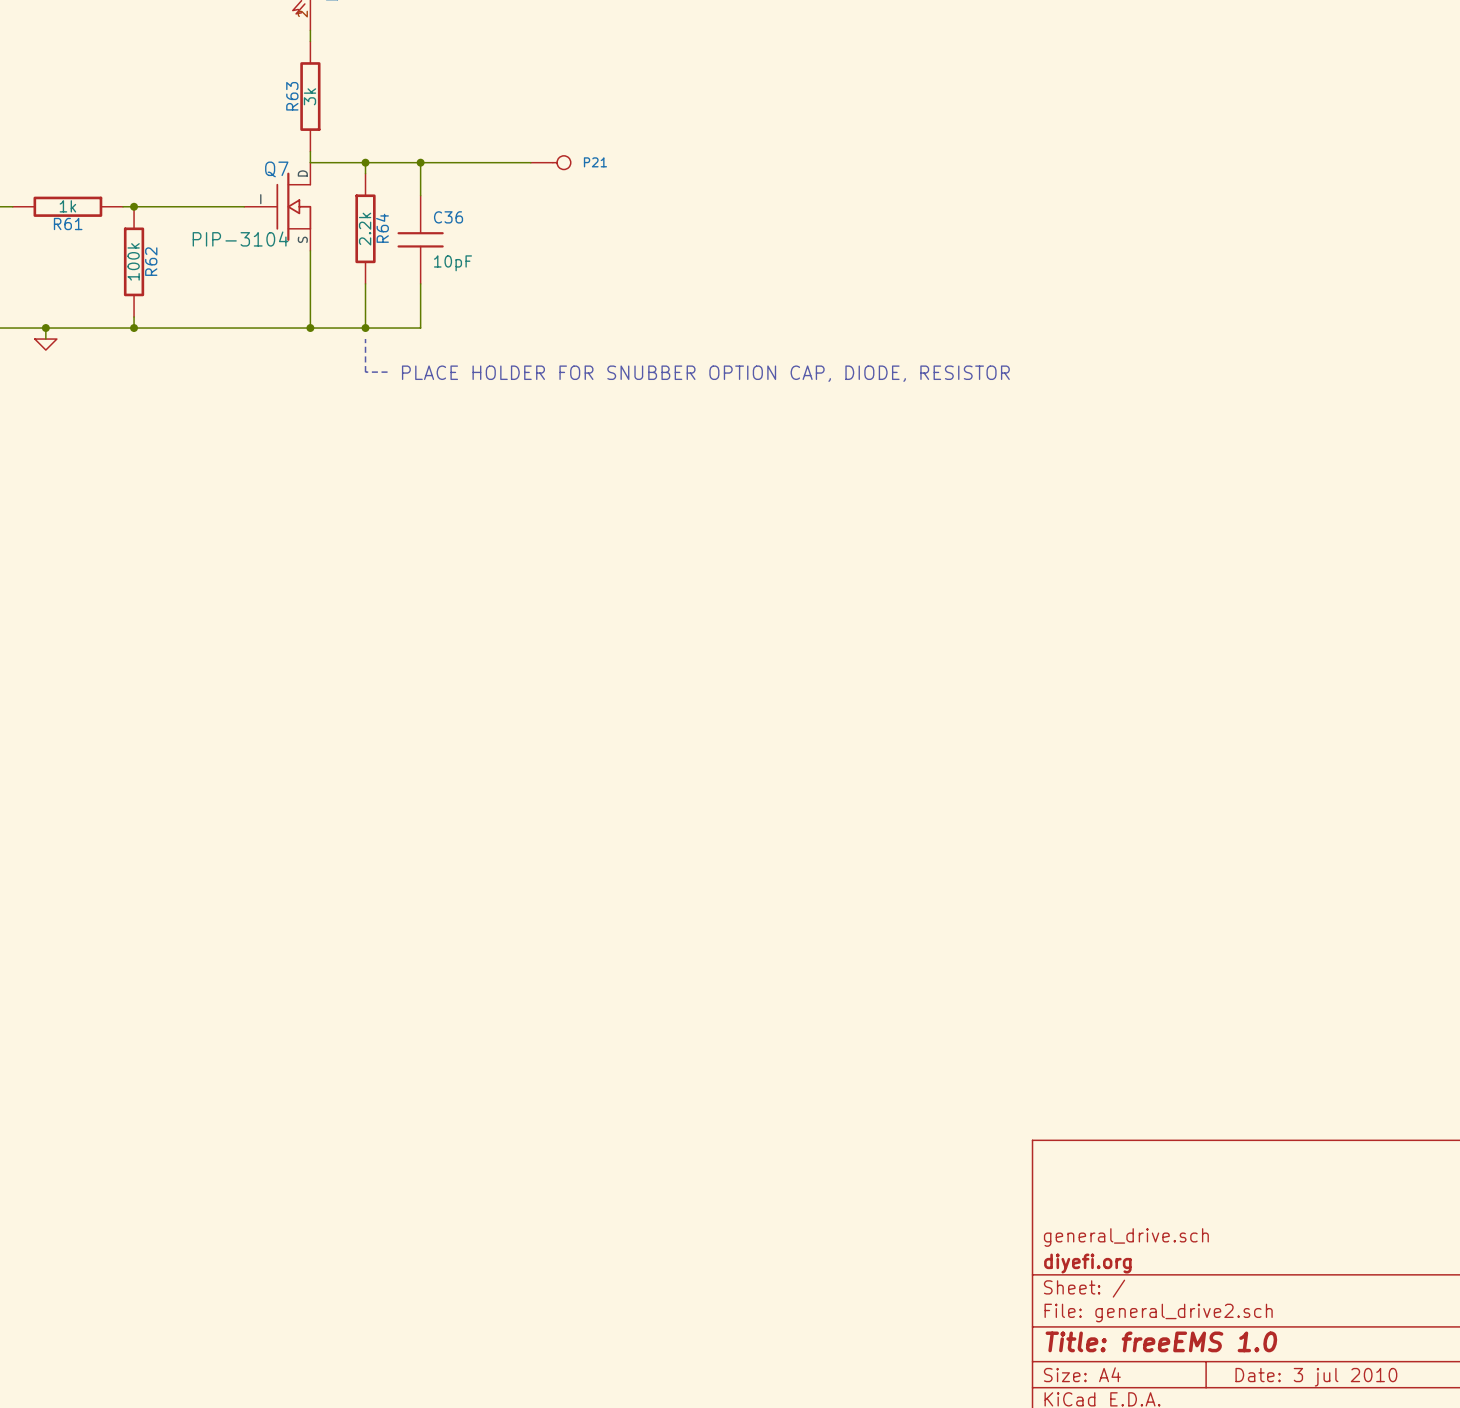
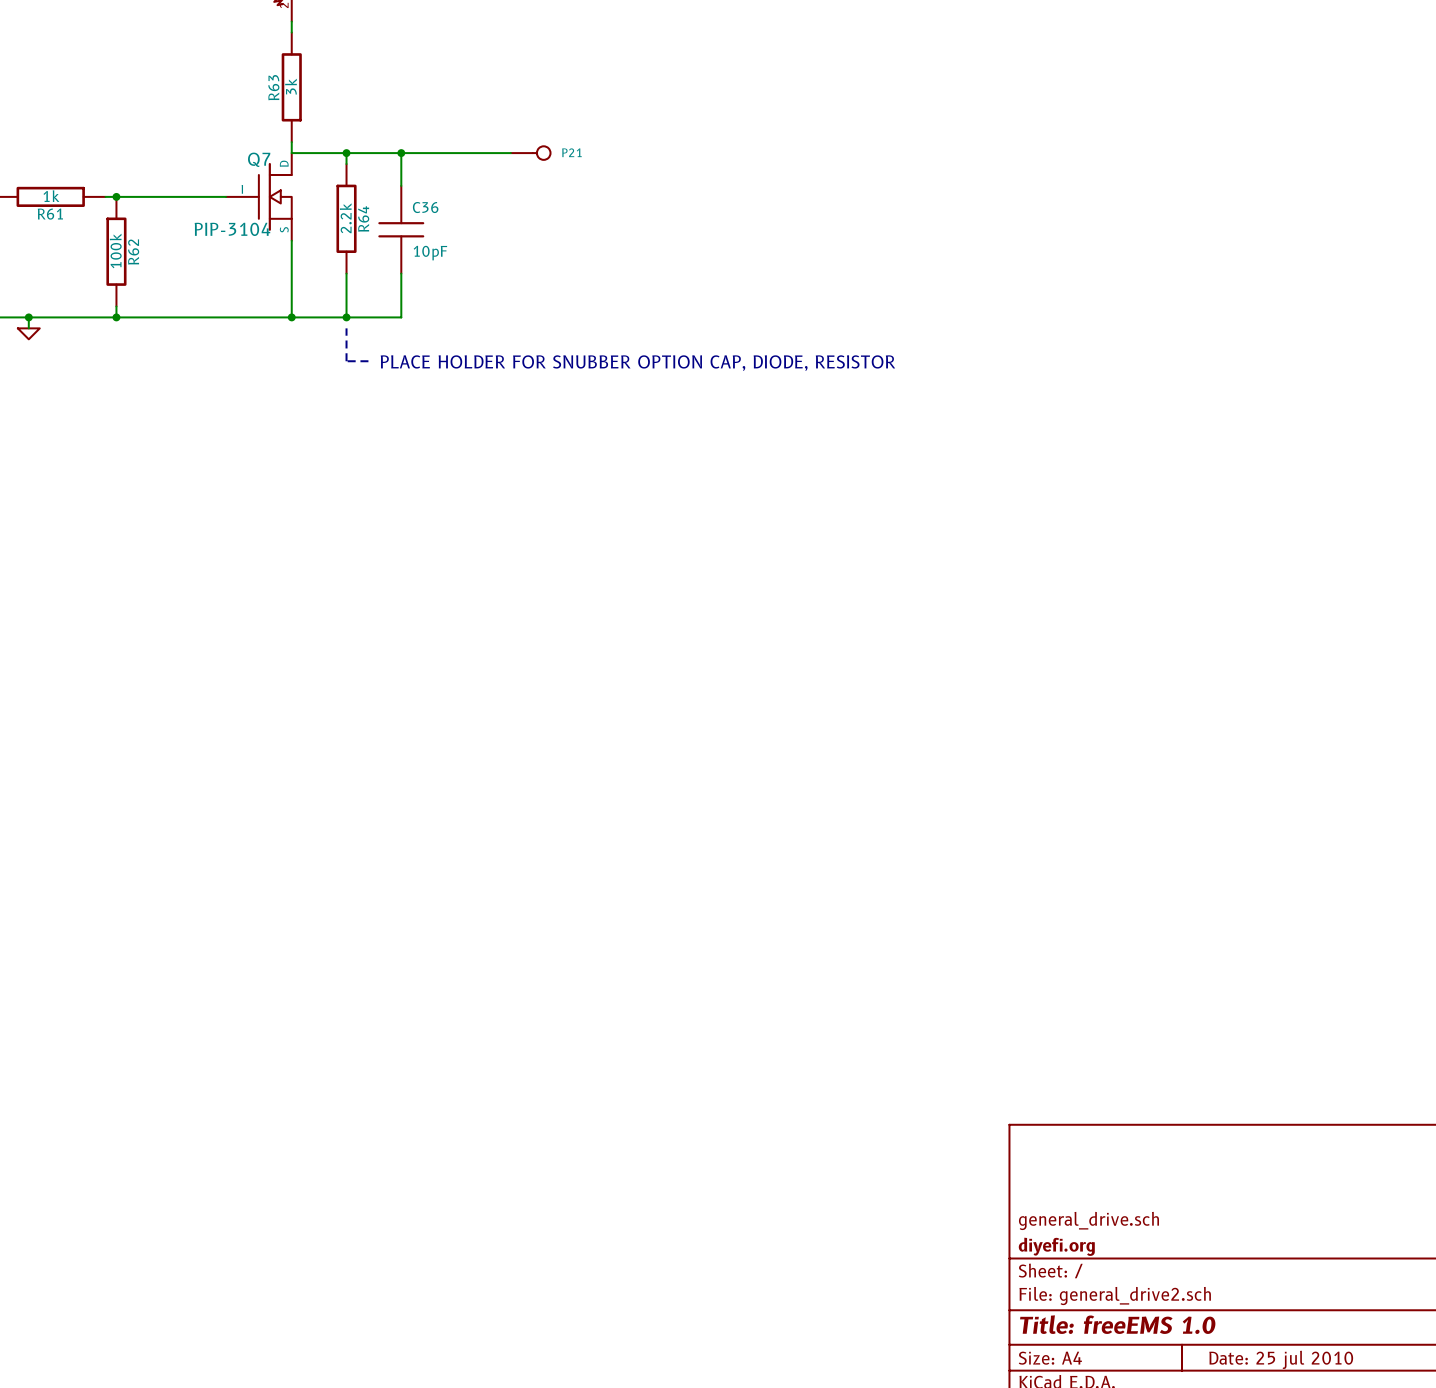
title block: Date: 3 jul 2010 (1316, 1377) -> Date: 25 jul 2010 (1281, 1359)

